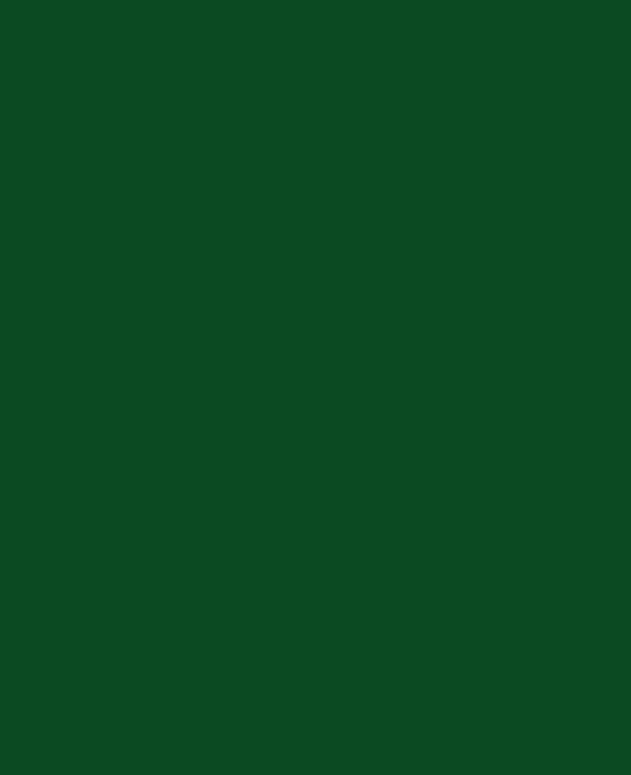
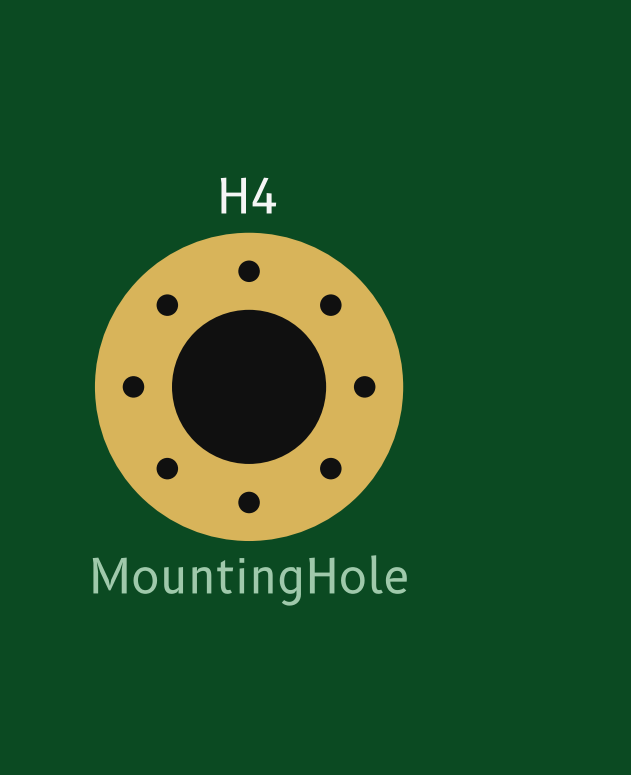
H4: none -> MountingHole (249, 386)

